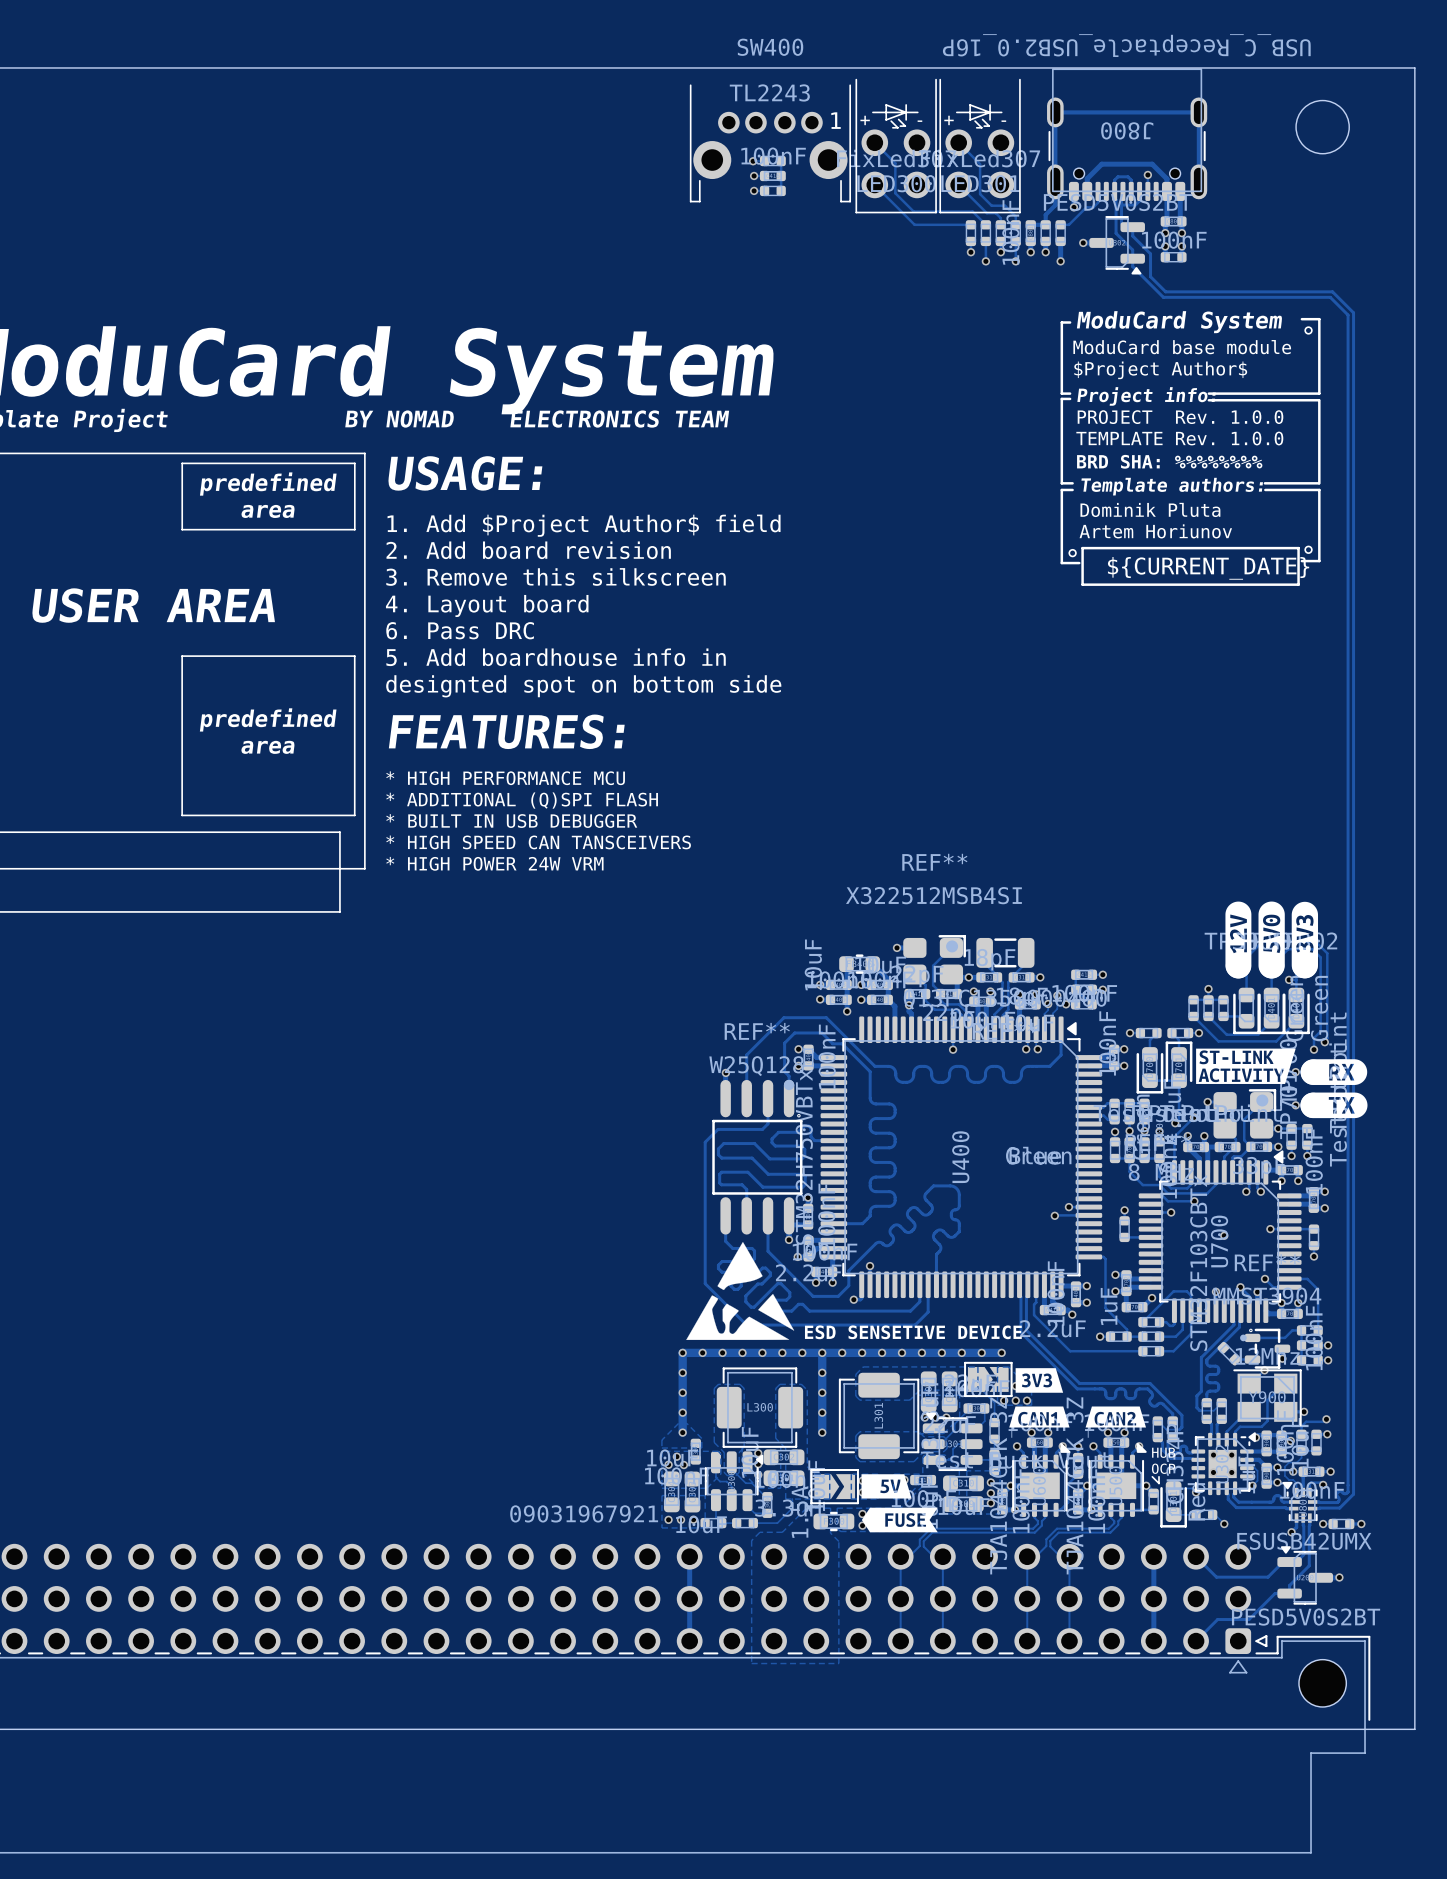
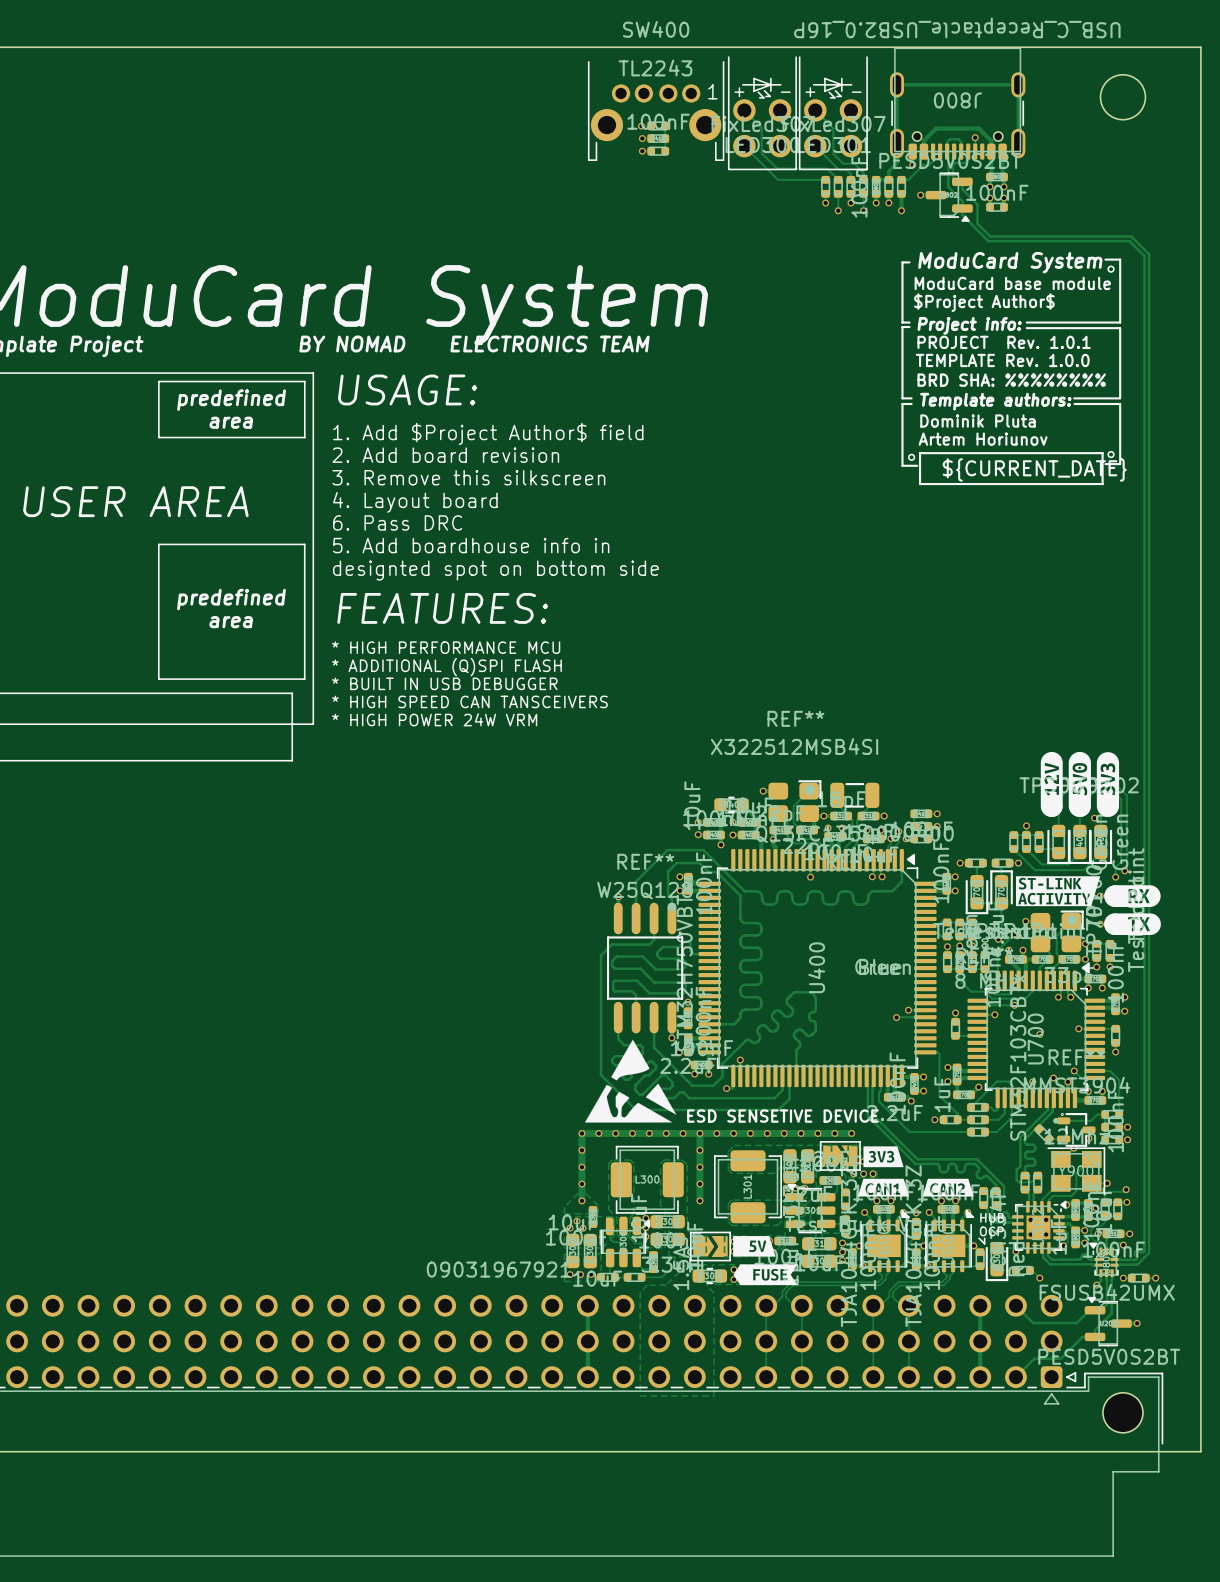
text: PROJECT Rev. 1.0.0 (1180, 417) -> PROJECT Rev. 1.0.1 (1004, 342)

